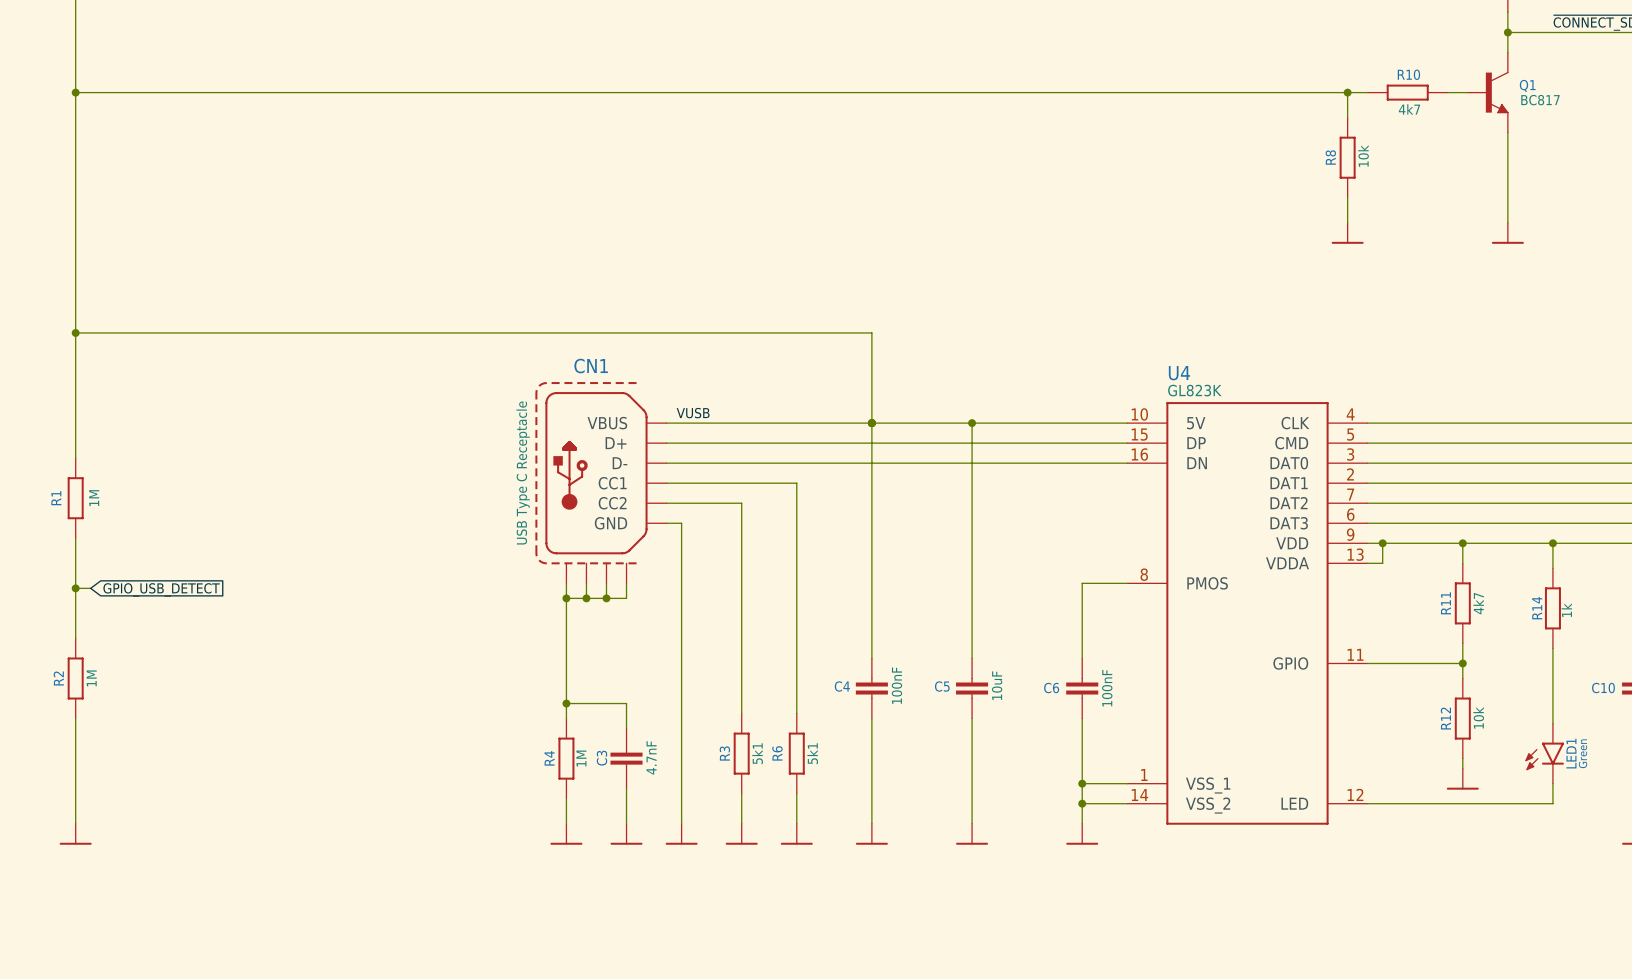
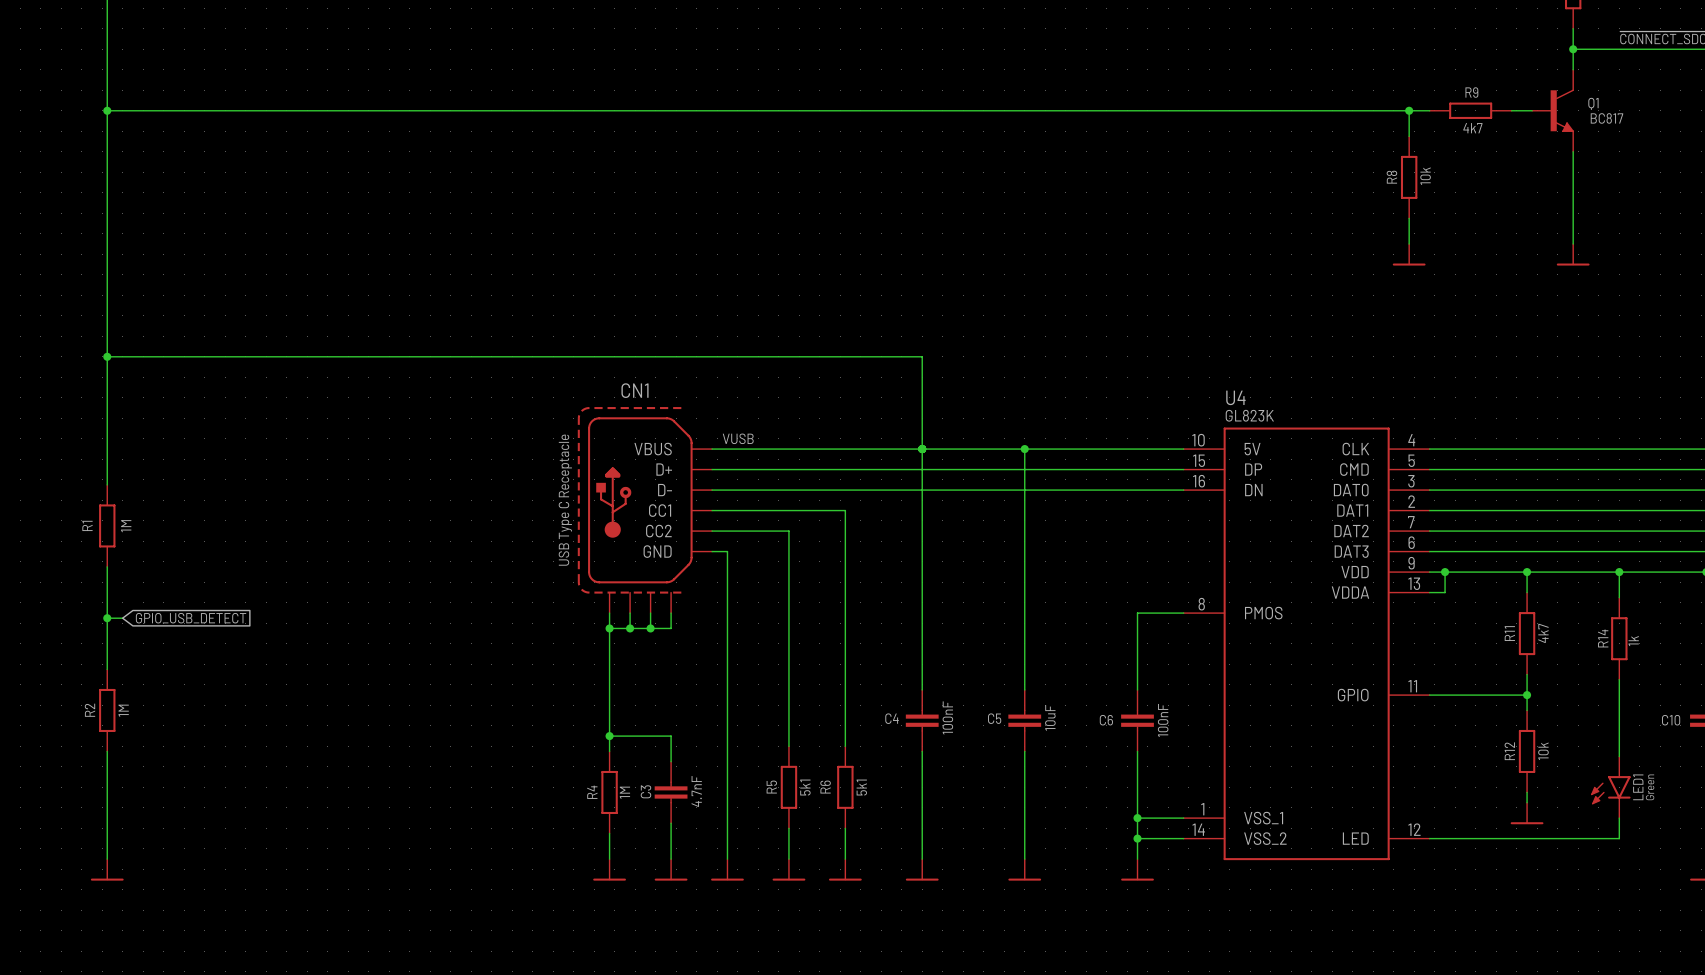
R10 name: R10 (1408, 74) -> R9 (1471, 92)
R3 name: R3 (724, 753) -> R5 (771, 787)

